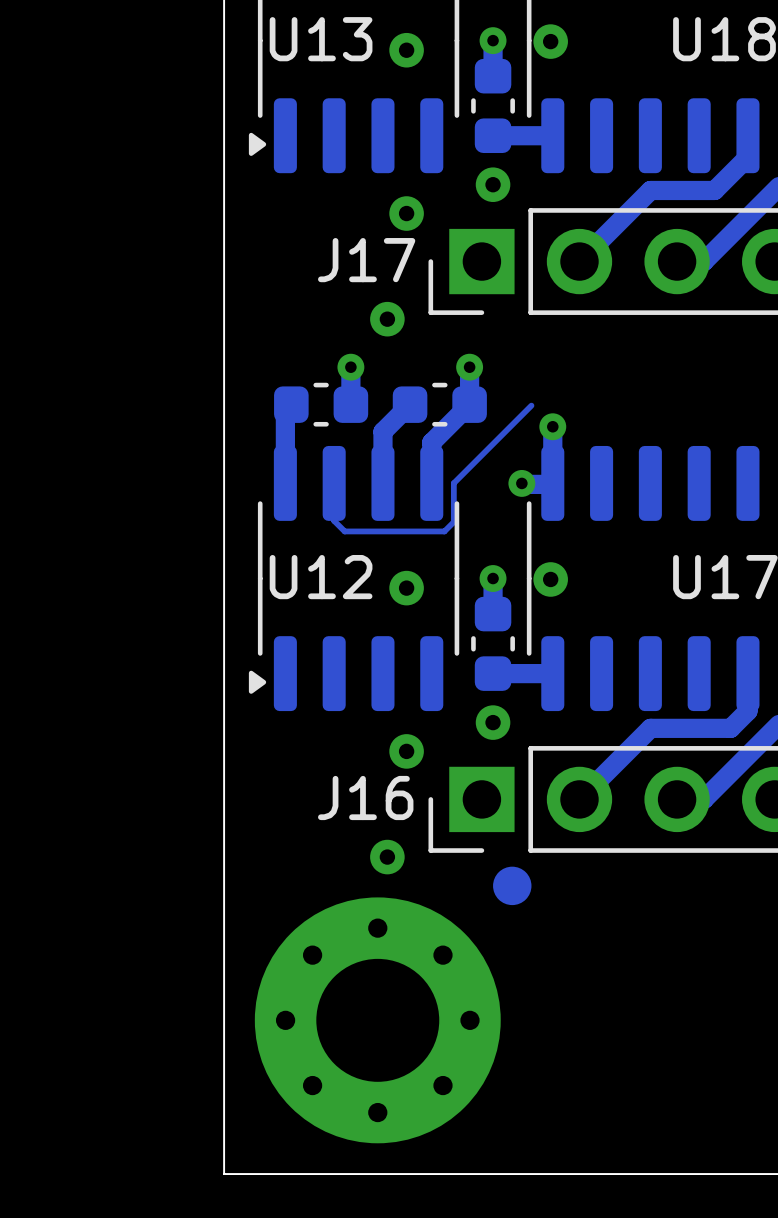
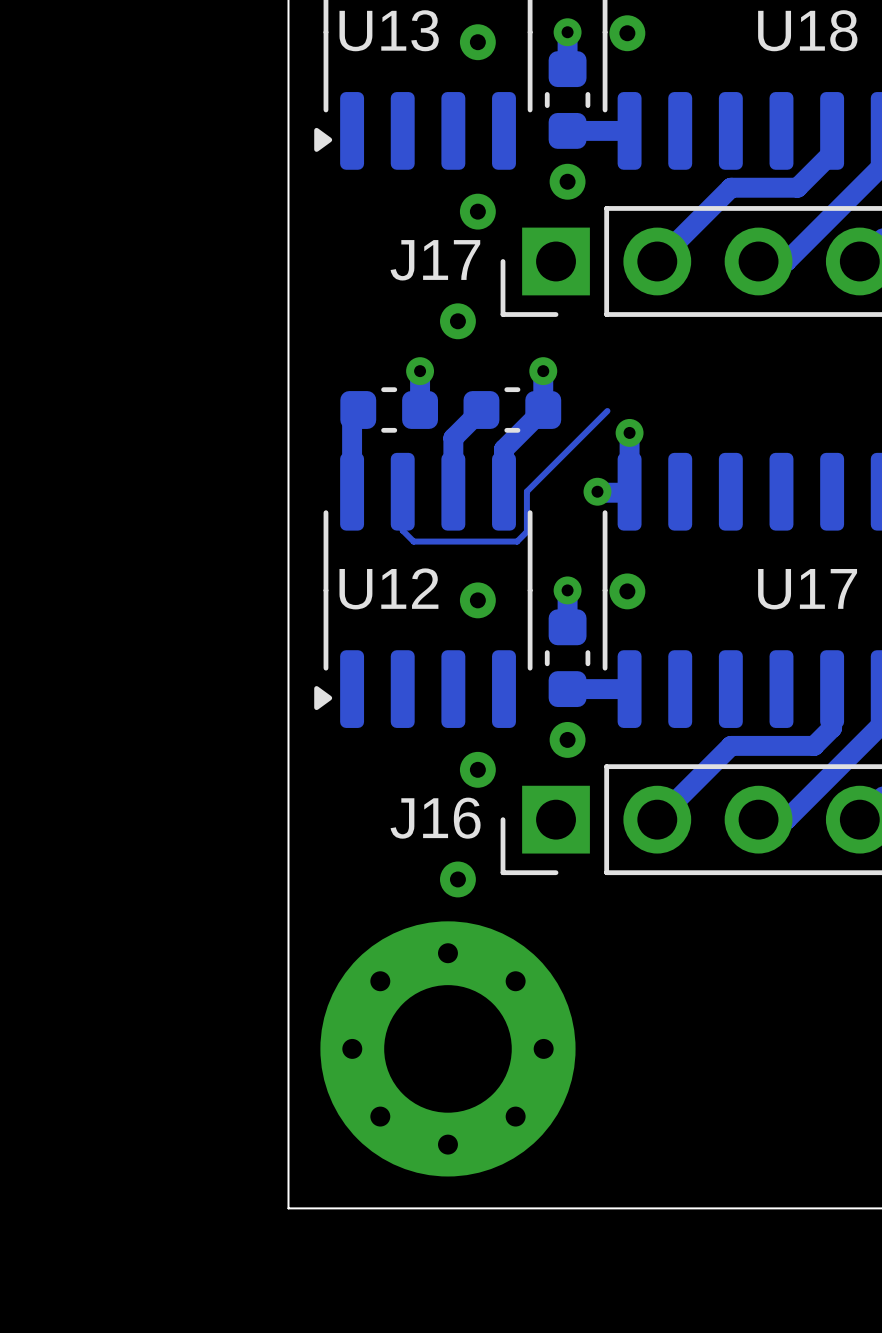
part: (512, 885) -> none

